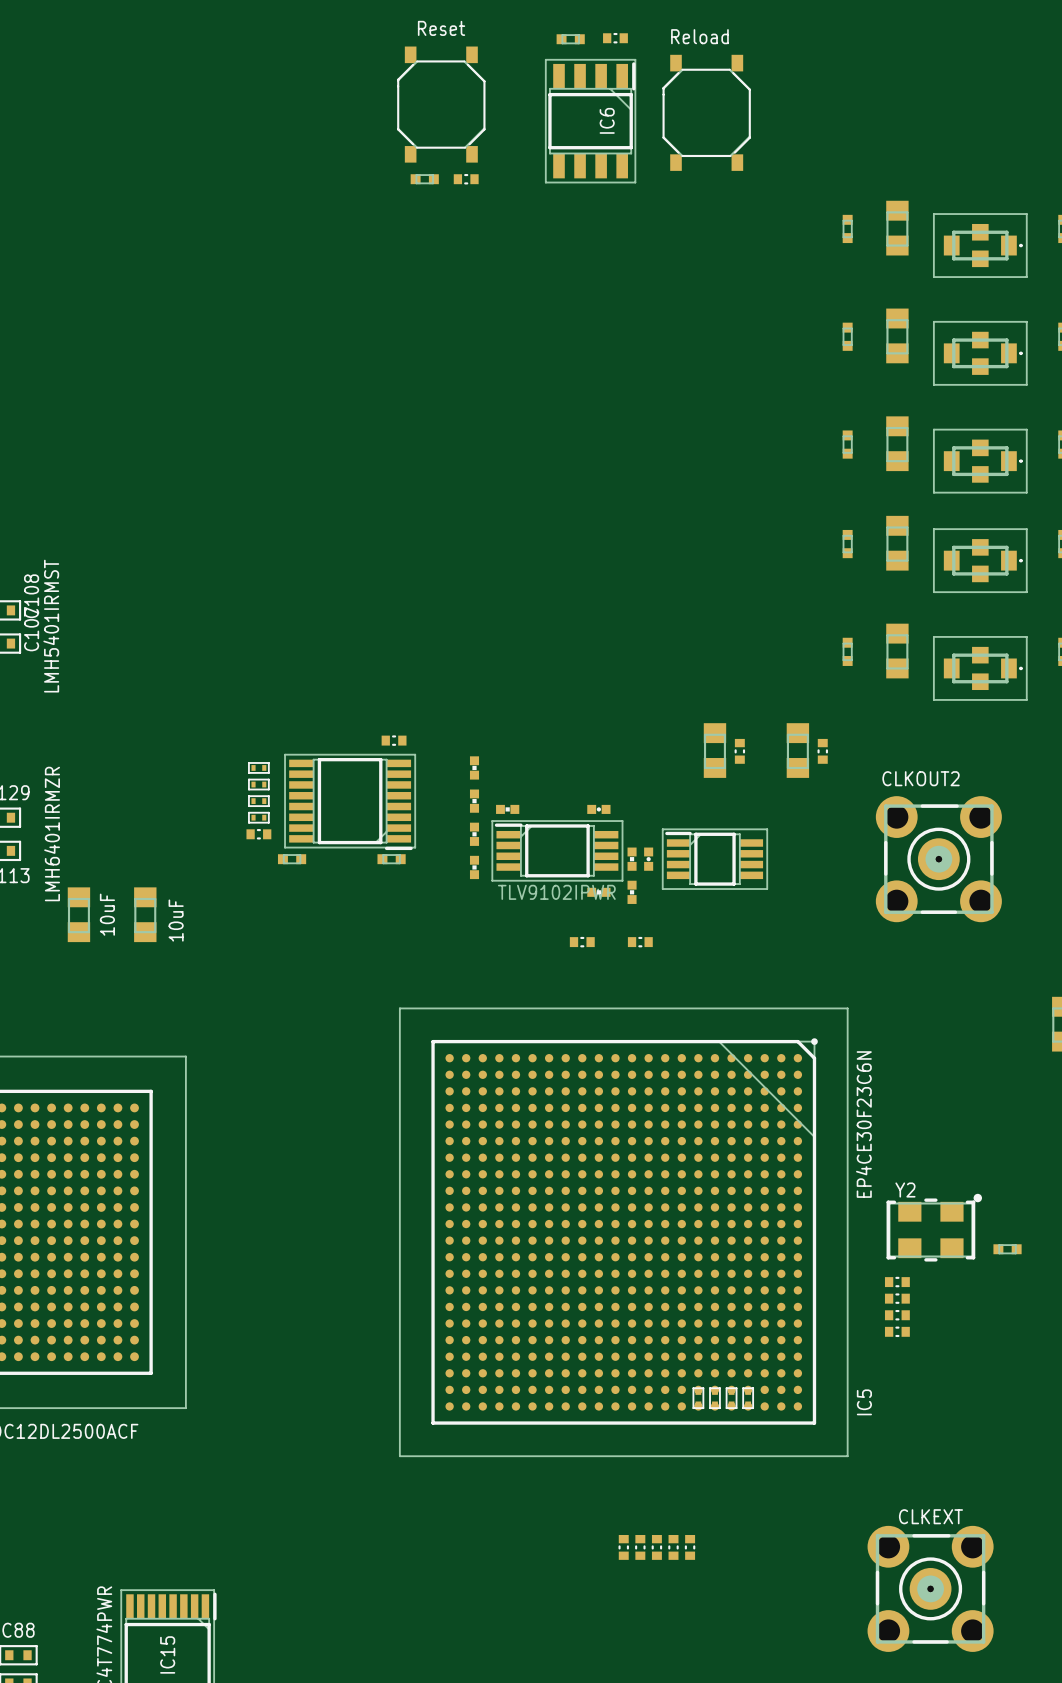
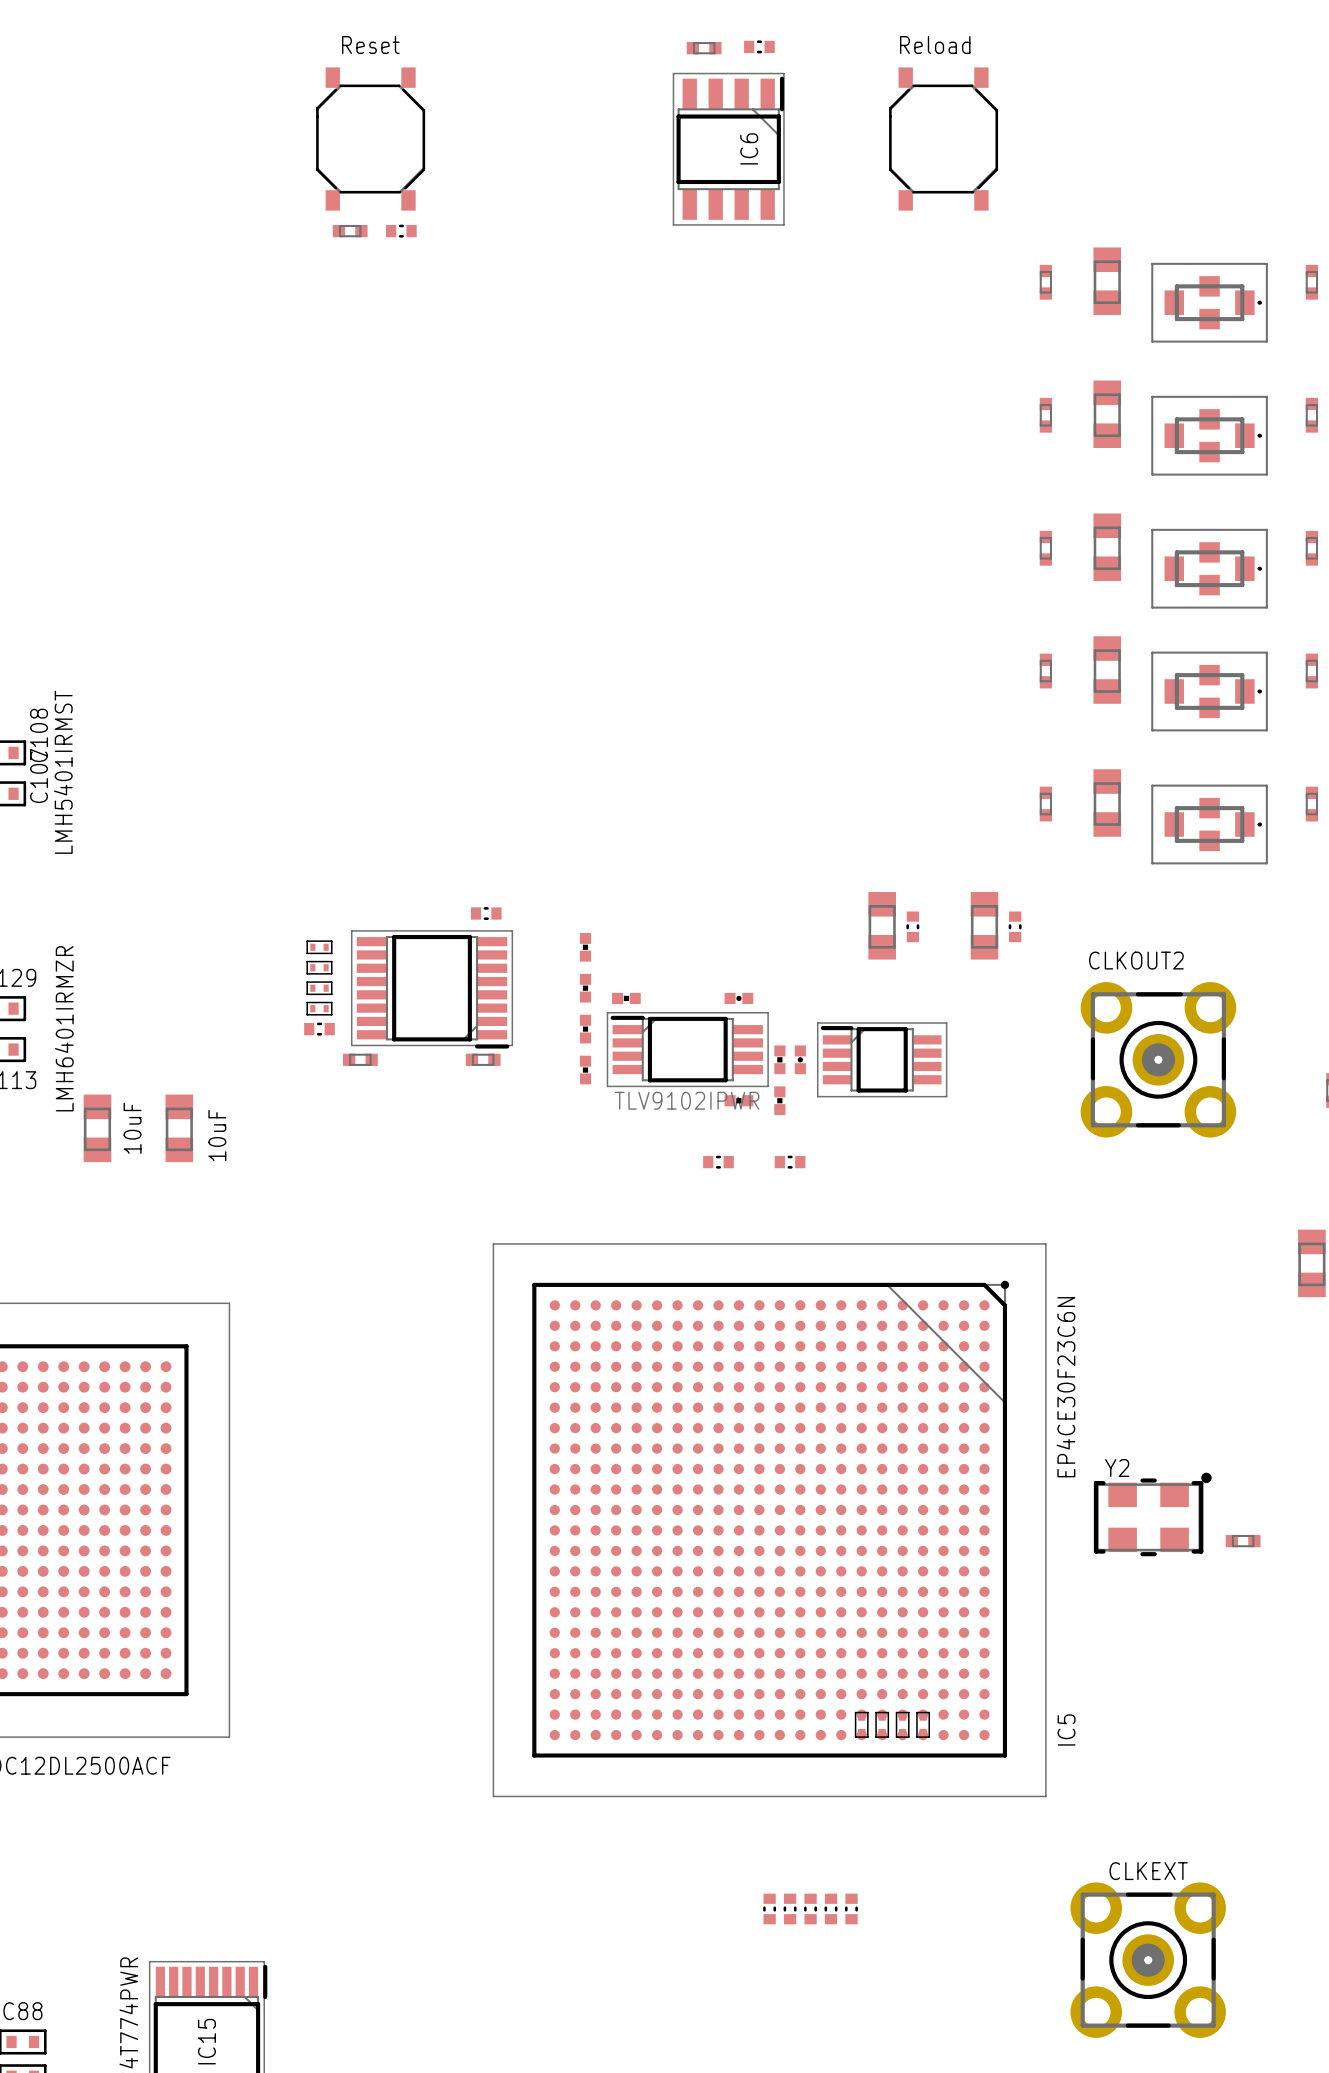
text position: Reset (441, 28) -> Reset (370, 45)
text position: Reload (699, 36) -> Reload (935, 45)
part position: (441, 104) -> (370, 139)
part position: (706, 112) -> (943, 139)
part position: (424, 179) -> (350, 231)
part position: (466, 179) -> (401, 231)
part: (897, 1282) -> none
part: (897, 1298) -> none
part: (897, 1315) -> none
part: (897, 1331) -> none

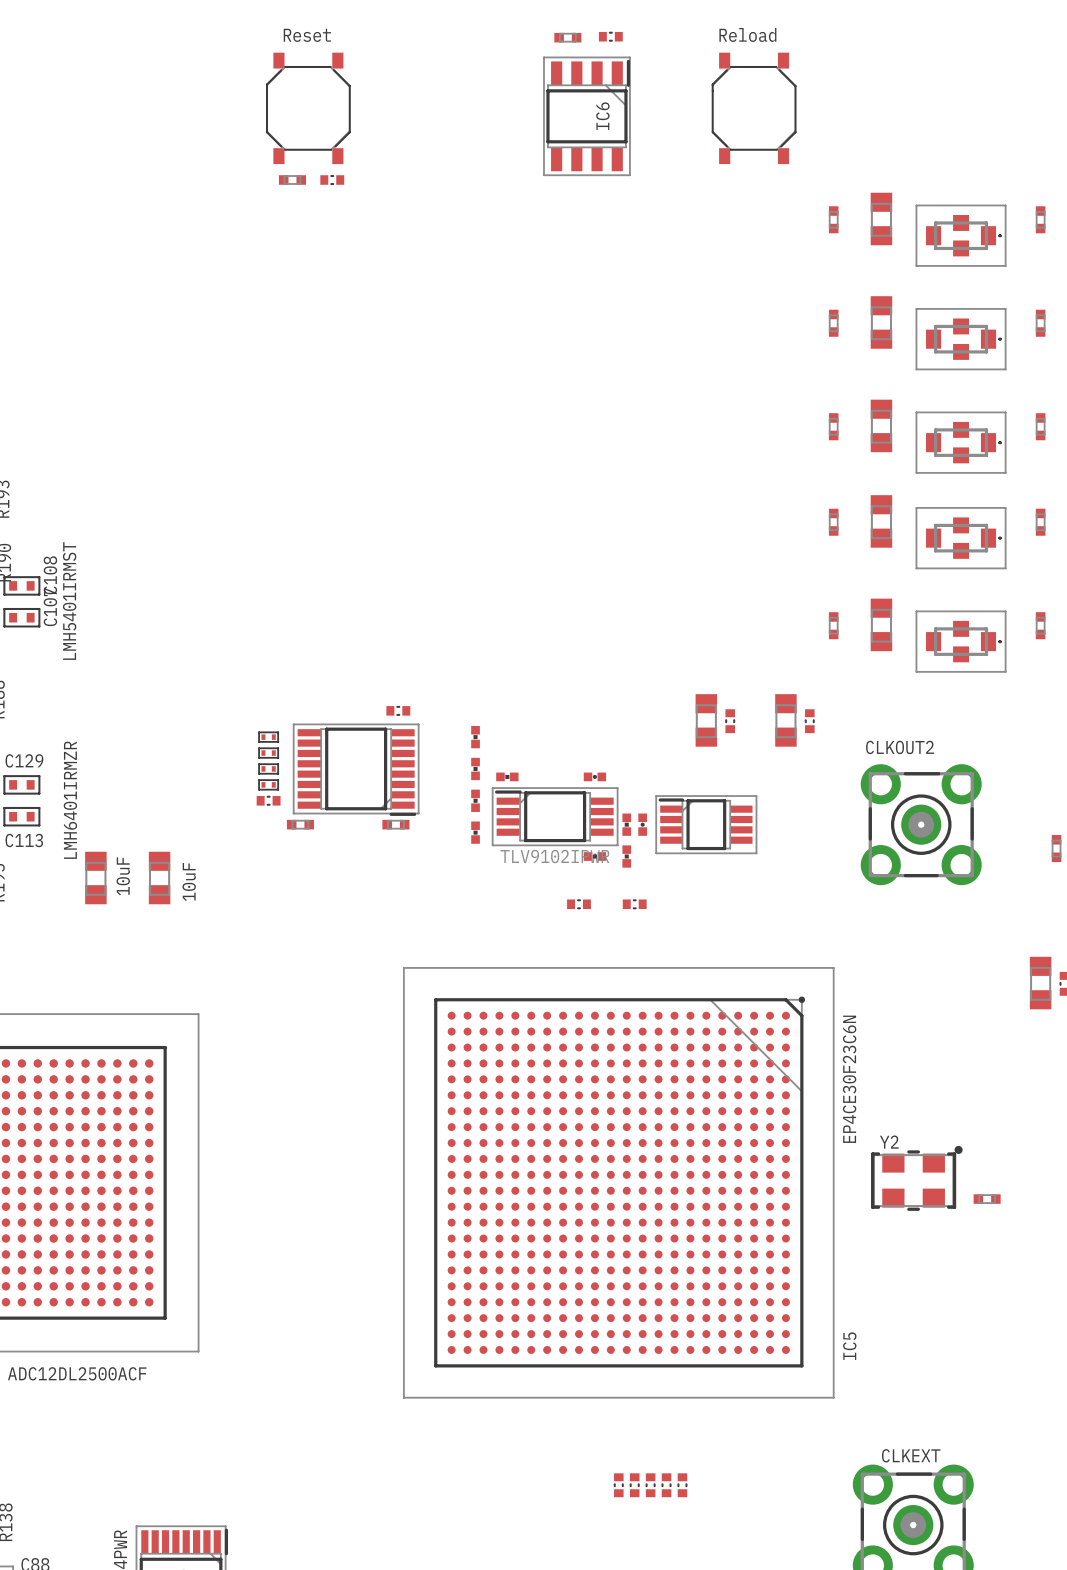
part: (861, 1724) -> none
part: (882, 1724) -> none
part: (902, 1724) -> none
part: (923, 1724) -> none

